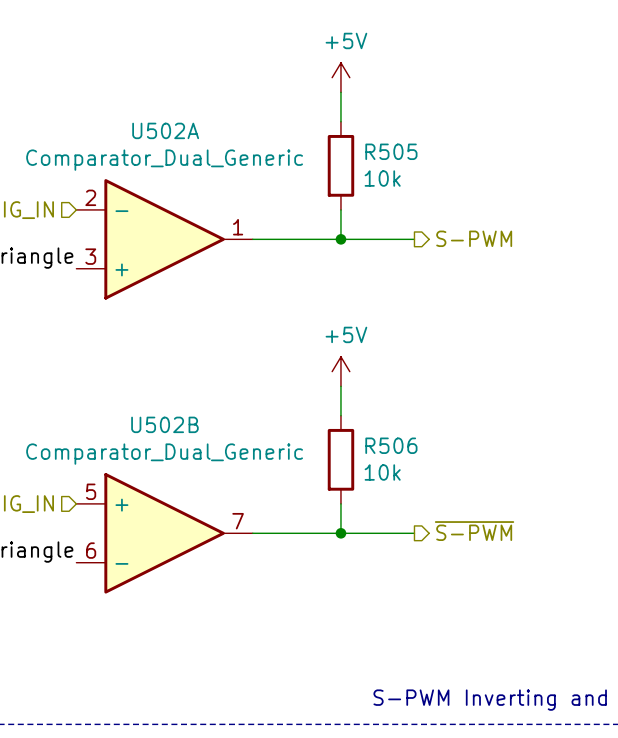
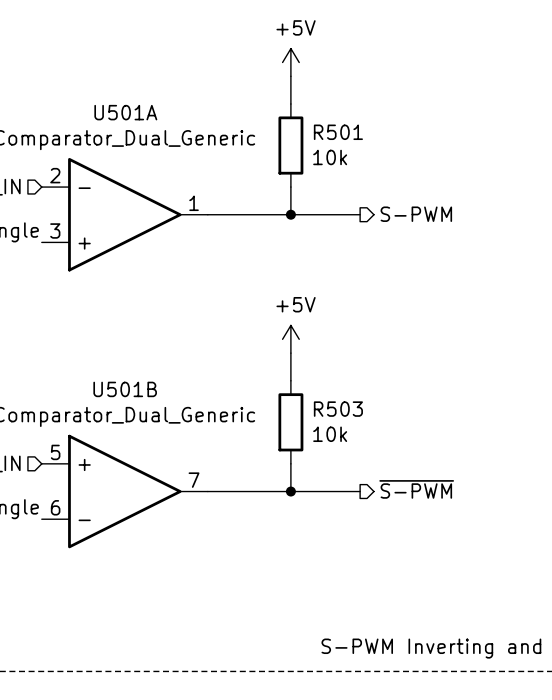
U502A name: U502A (165, 130) -> U501A (125, 112)
R505 name: R505 (391, 151) -> R501 (338, 132)
U502B name: U502B (164, 424) -> U501B (125, 389)
R506 name: R506 (391, 445) -> R503 (338, 409)

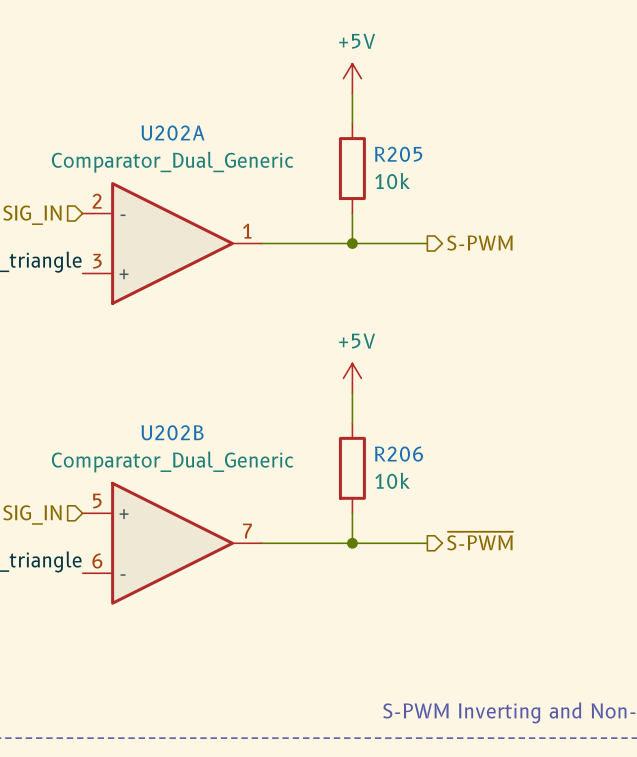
U501A name: U501A (125, 112) -> U202A (172, 133)
R501 name: R501 (338, 132) -> R205 (398, 154)
U501B name: U501B (125, 389) -> U202B (172, 432)
R503 name: R503 (338, 409) -> R206 (398, 454)

